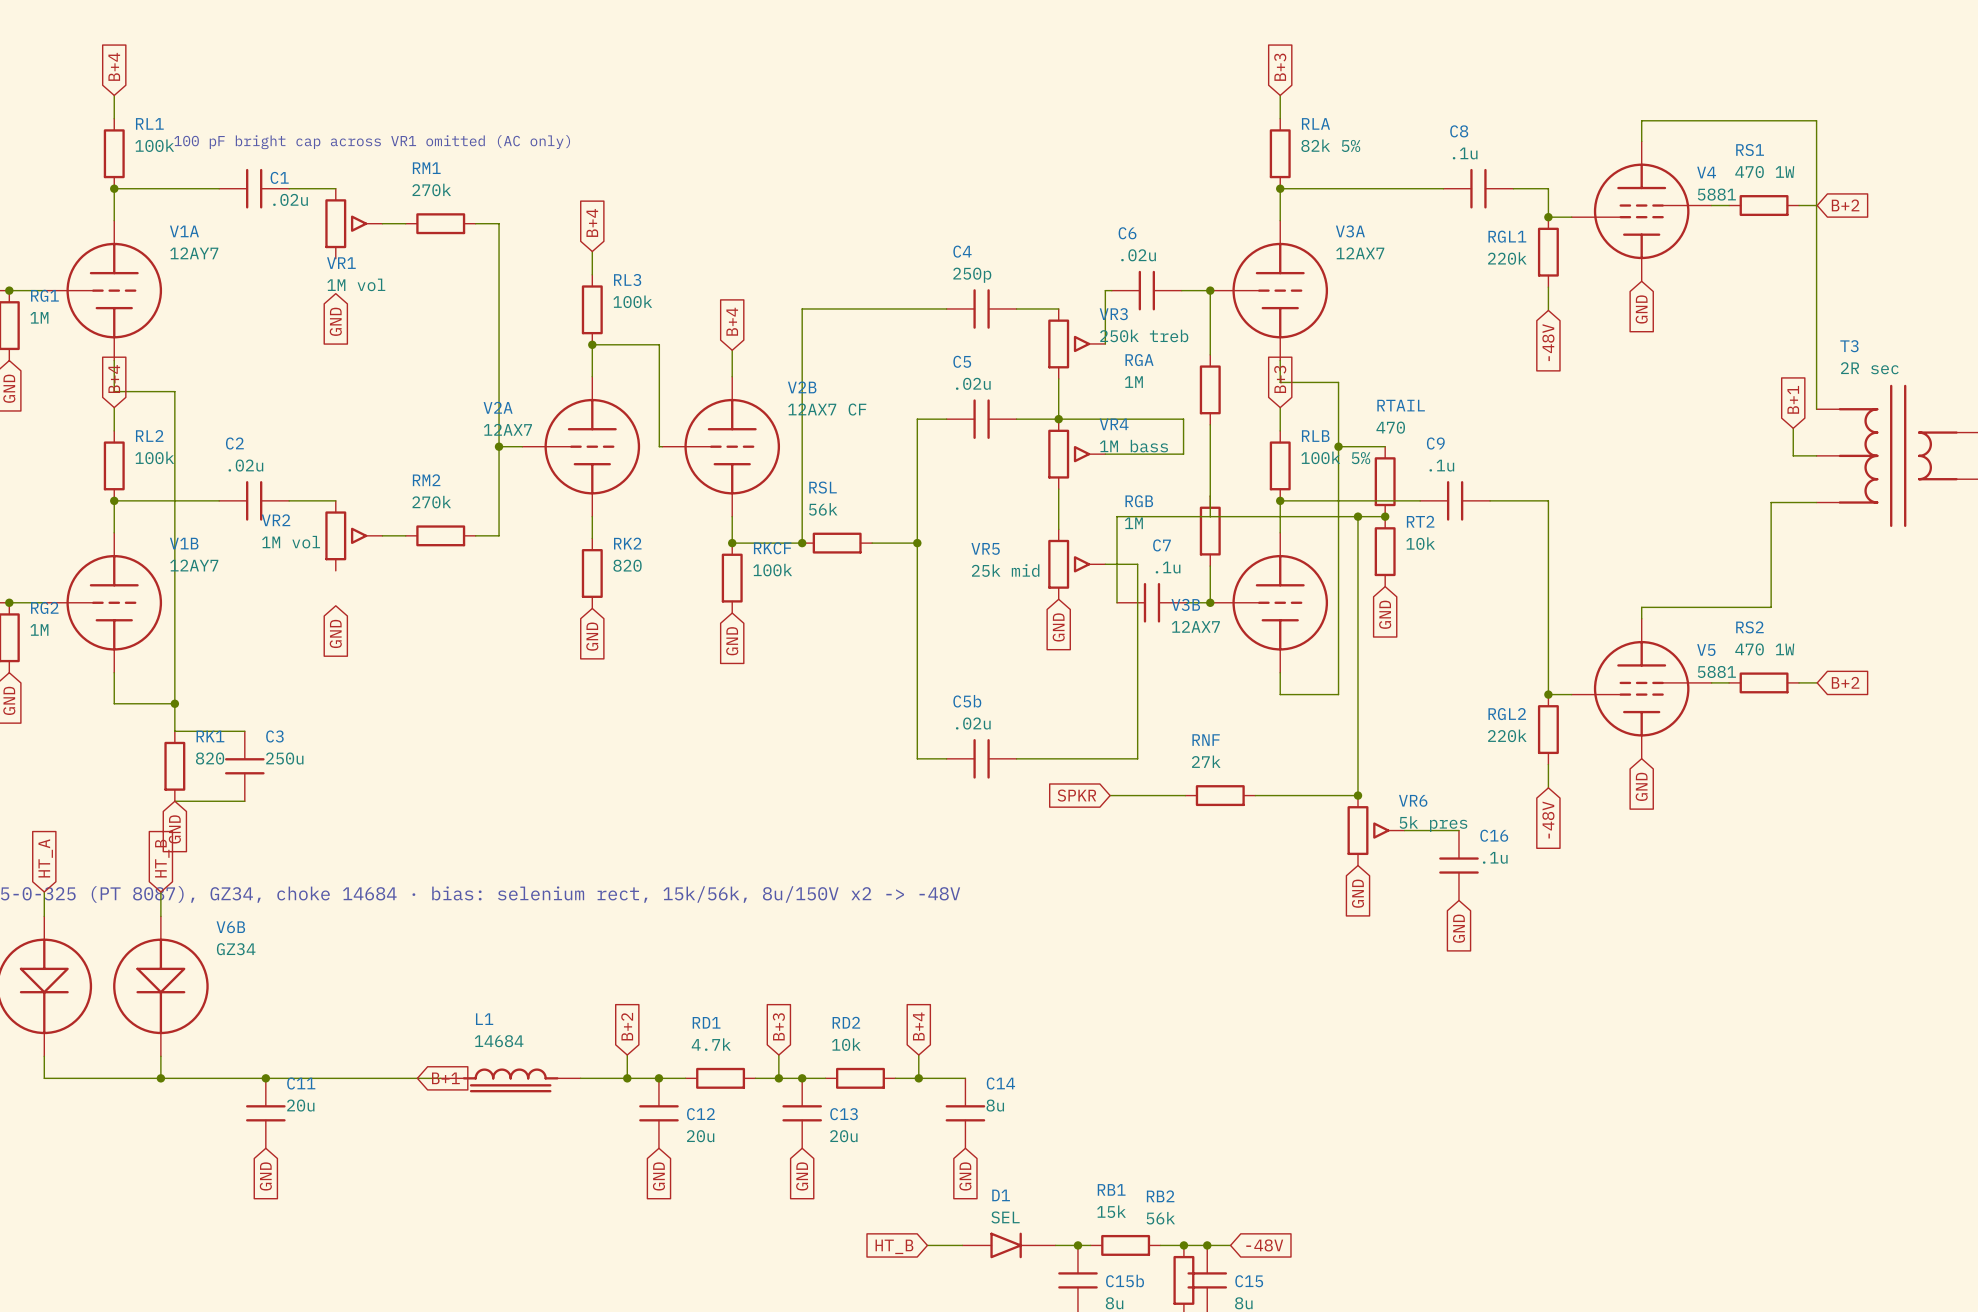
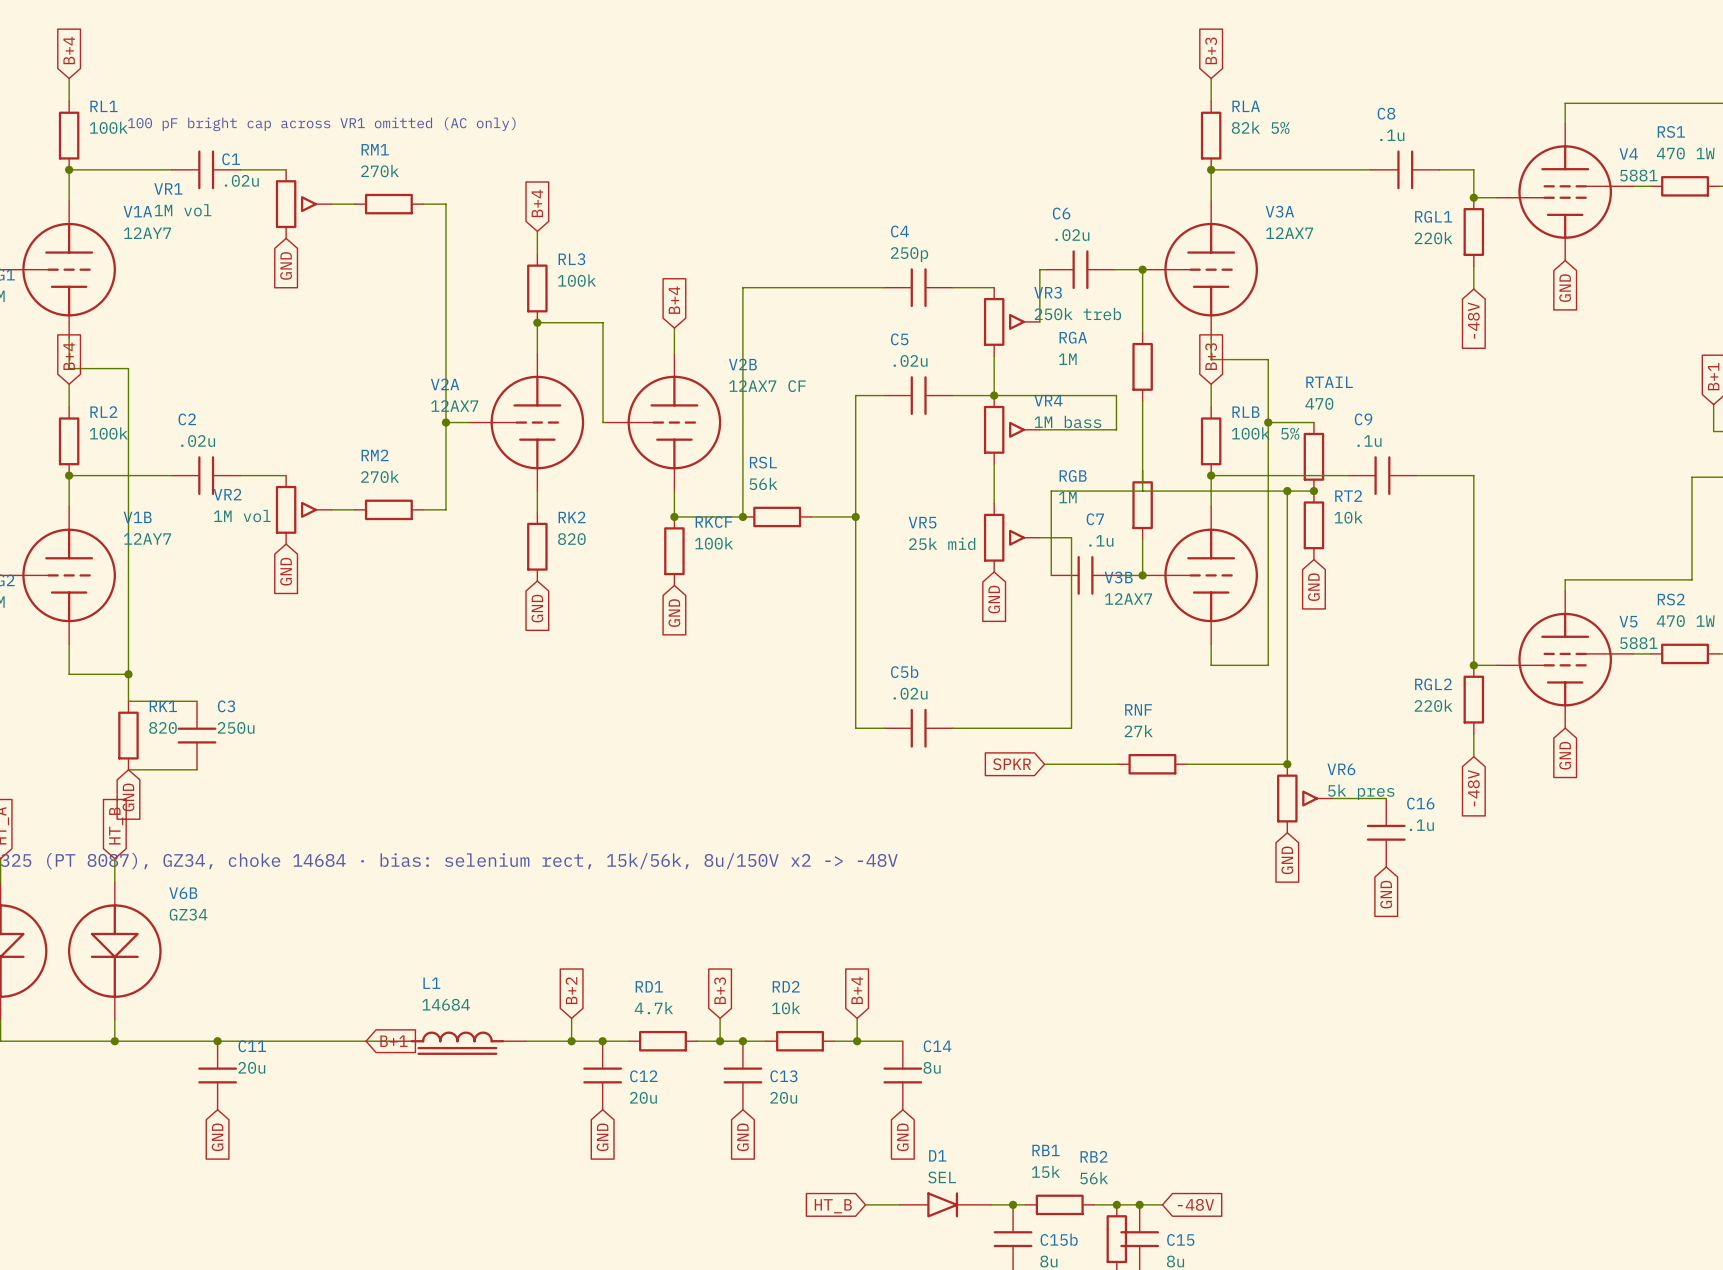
VR1 name position: VR1 (341, 263) -> VR1 (168, 188)
VR1 value position: 1M vol (356, 284) -> 1M vol (182, 210)
global label position: GND (335, 321) -> GND (286, 265)
global label position: GND (335, 633) -> GND (286, 571)

